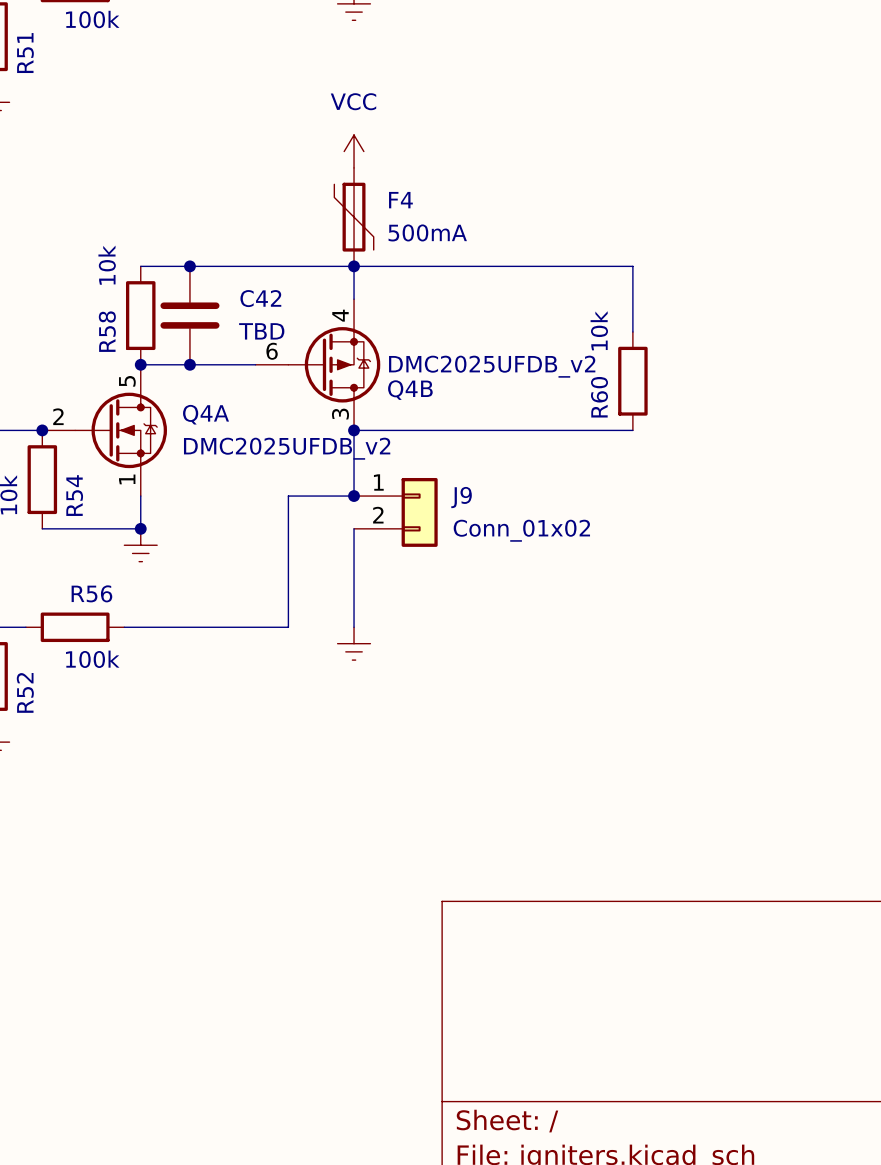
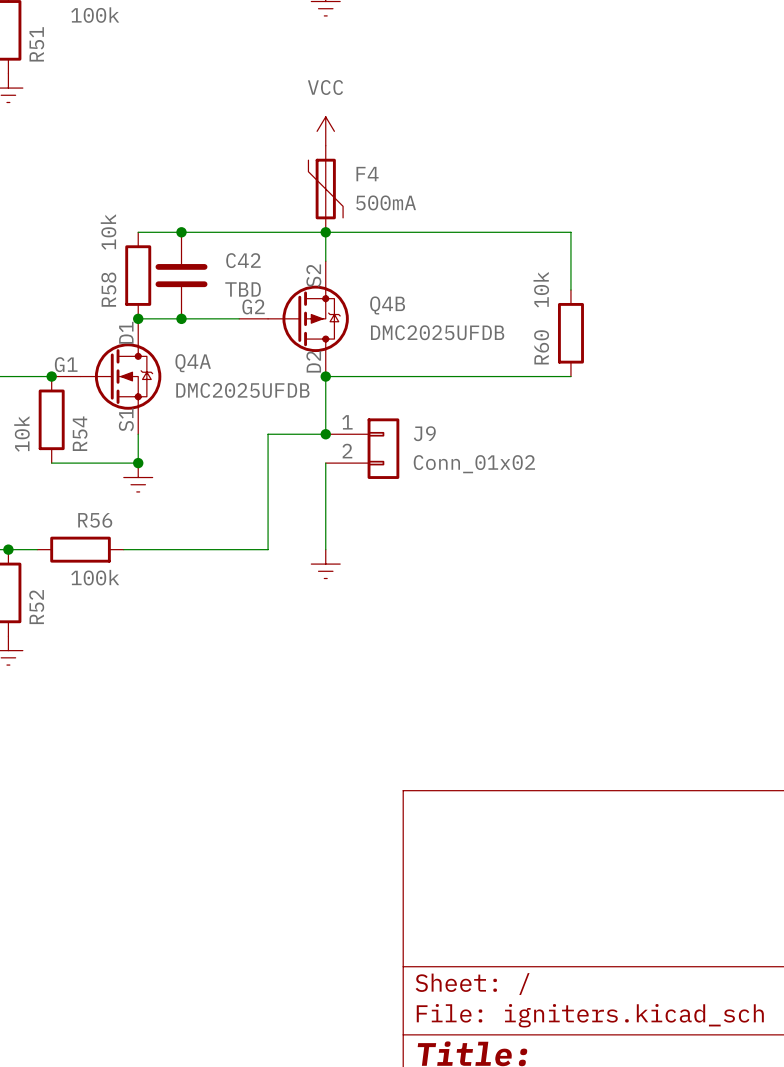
Q4B pin number: 4 (340, 315) -> S2 (313, 275)
Q4B pin number: 6 (272, 351) -> G2 (253, 306)
Q4B value: DMC2025UFDB_v2 (492, 366) -> DMC2025UFDB (437, 332)
Q4A pin number: 5 (127, 381) -> D1 (126, 332)
Q4B name position: Q4B (410, 390) -> Q4B (387, 305)
Q4B pin number: 3 (340, 414) -> D2 (313, 361)
Q4A pin number: 2 (58, 416) -> G1 (66, 364)
Q4A value: DMC2025UFDB_v2 (287, 448) -> DMC2025UFDB (242, 390)
Q4A pin number: 1 (127, 479) -> S1 (126, 419)

